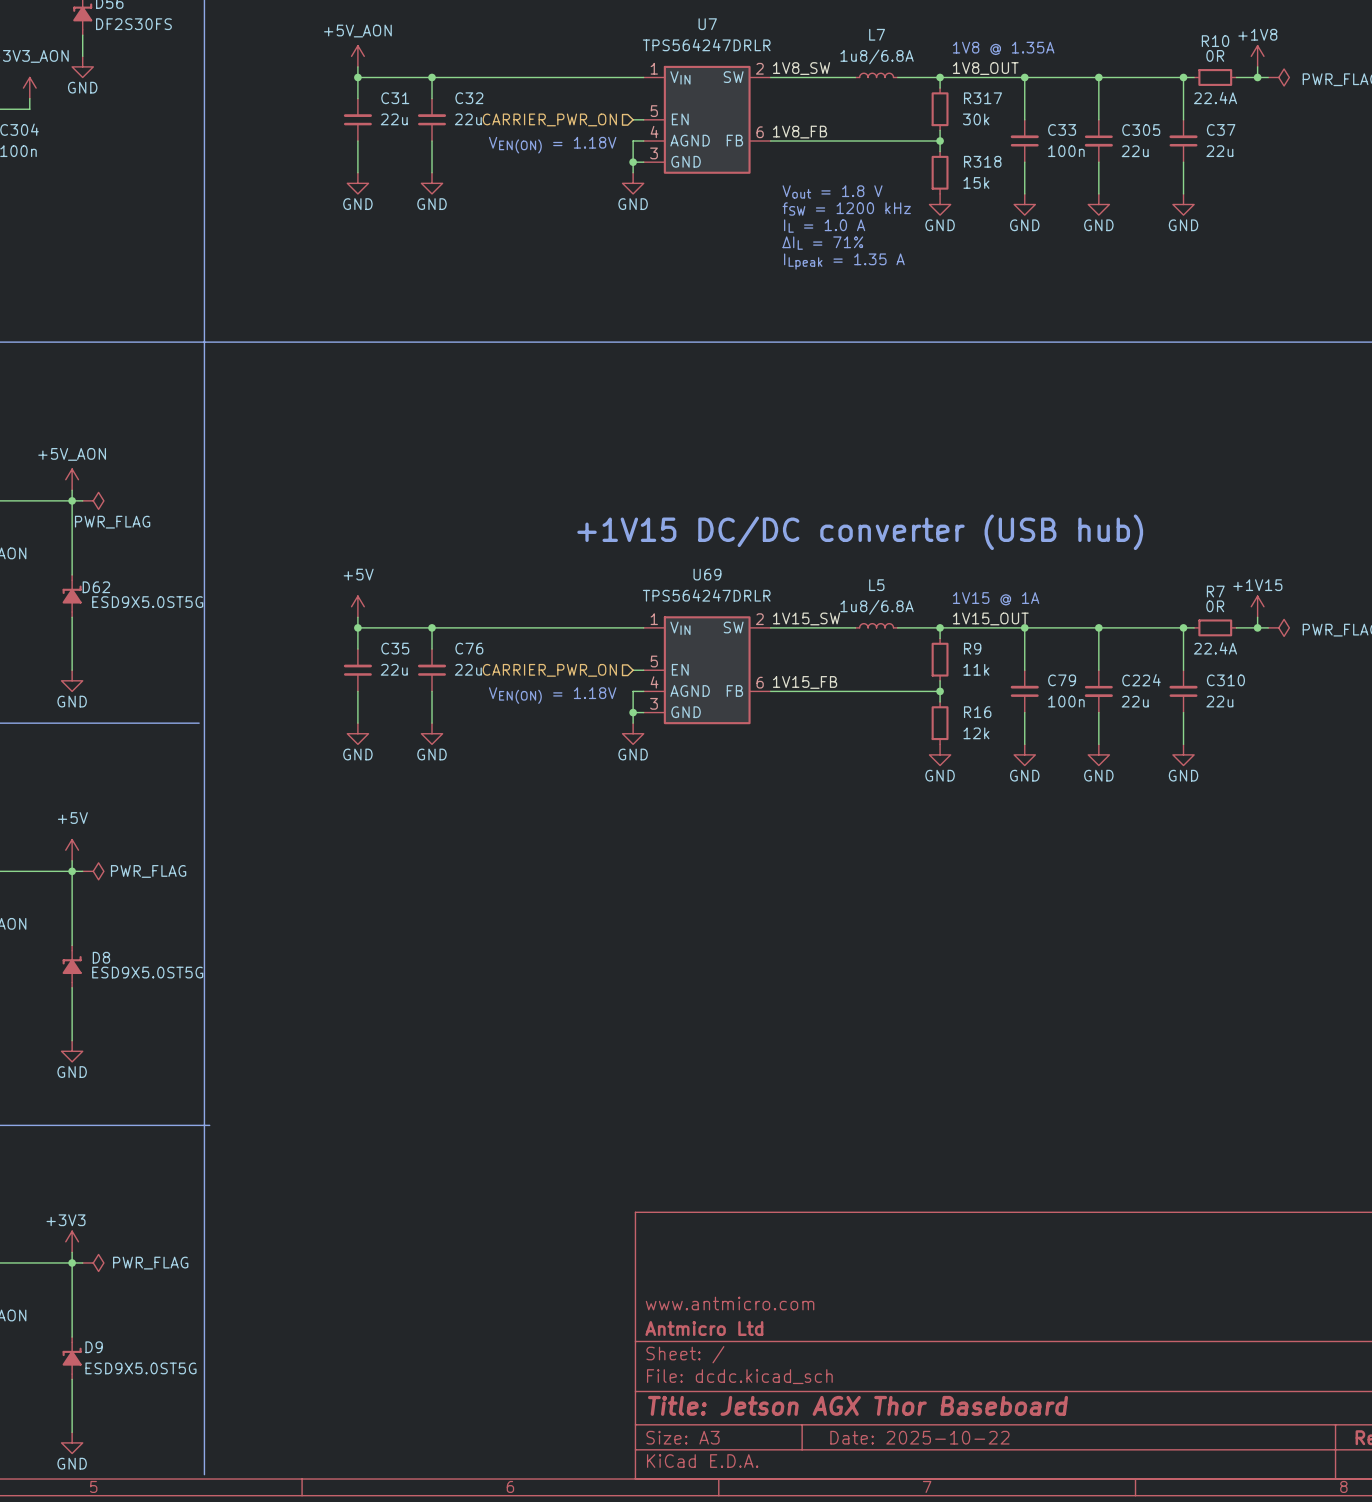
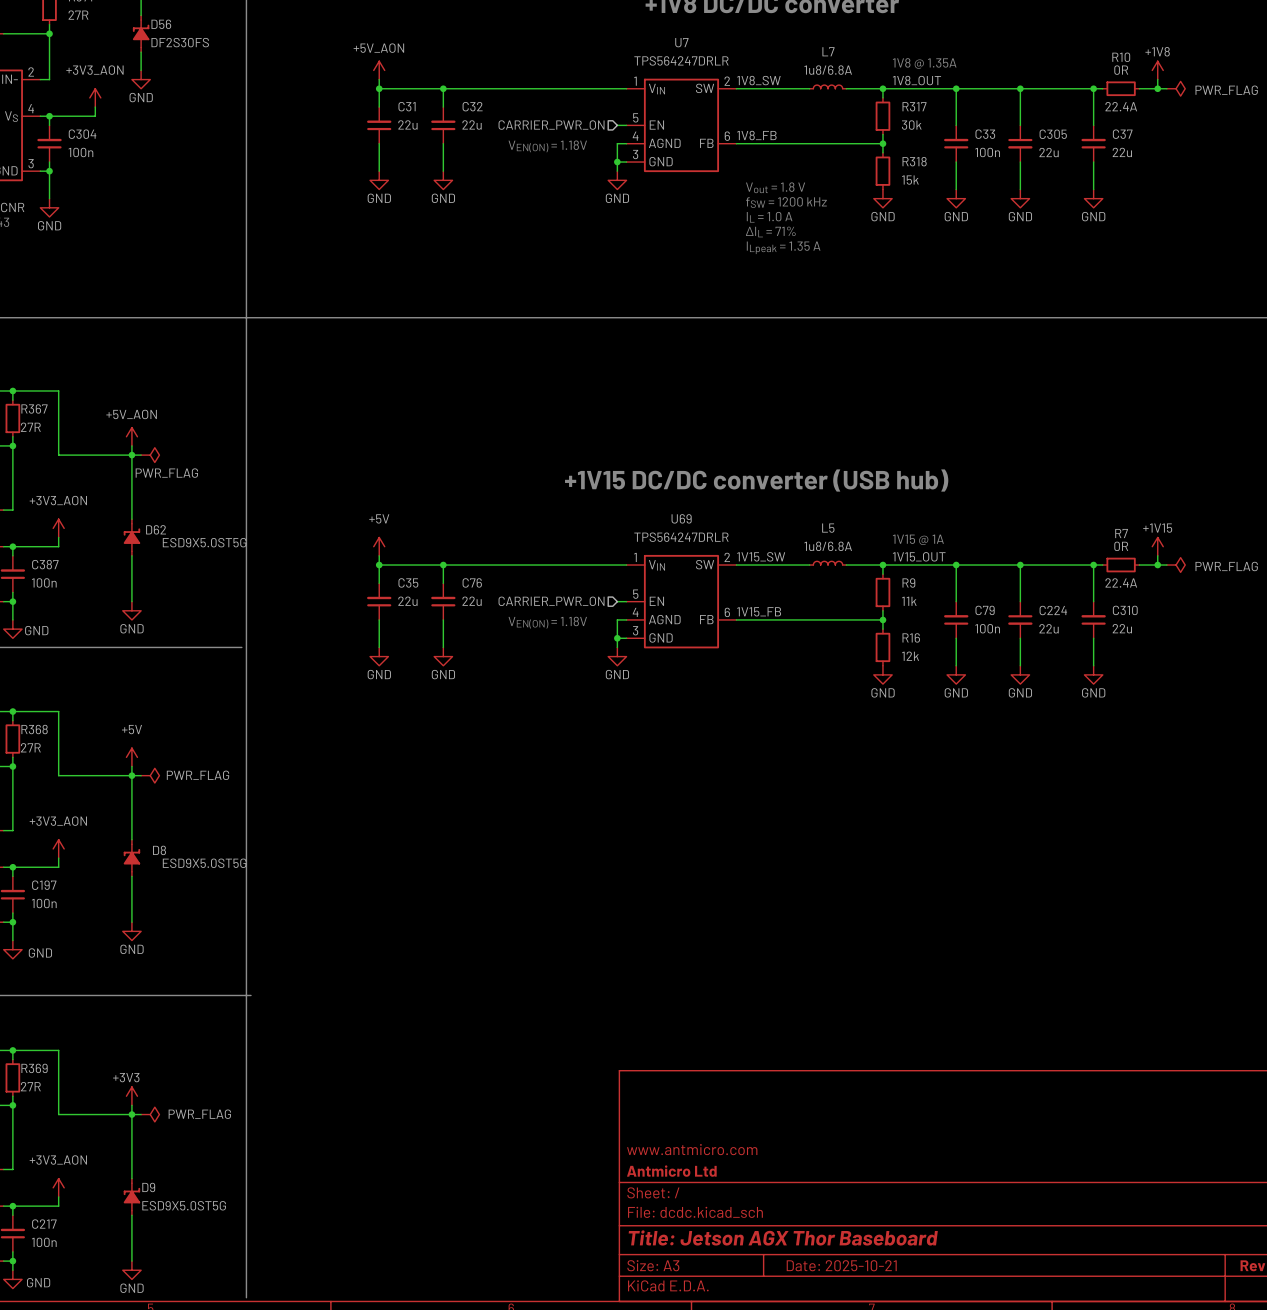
title block: Date: 2025-10-22 (919, 1437) -> Date: 2025-10-21 (841, 1265)

